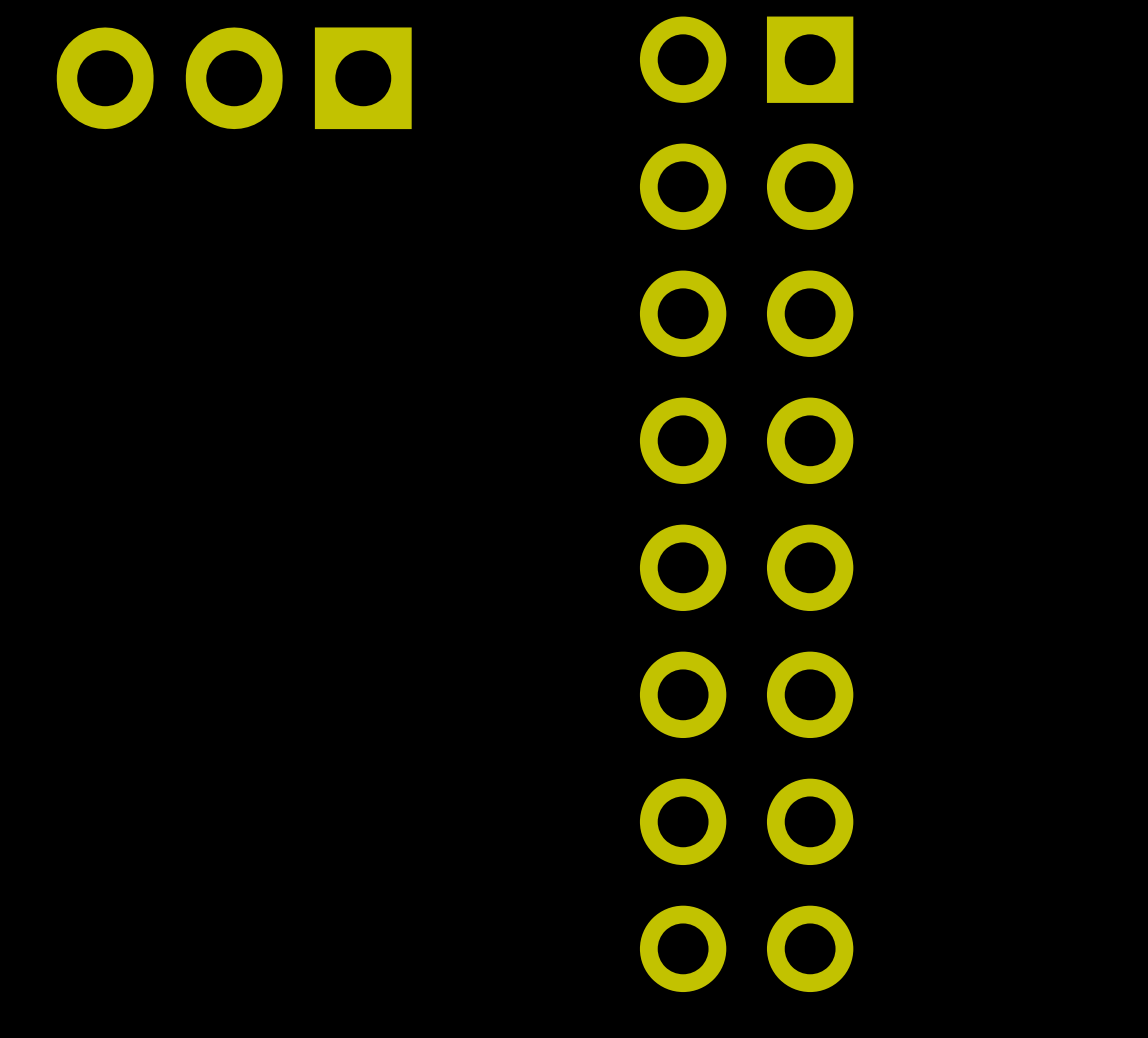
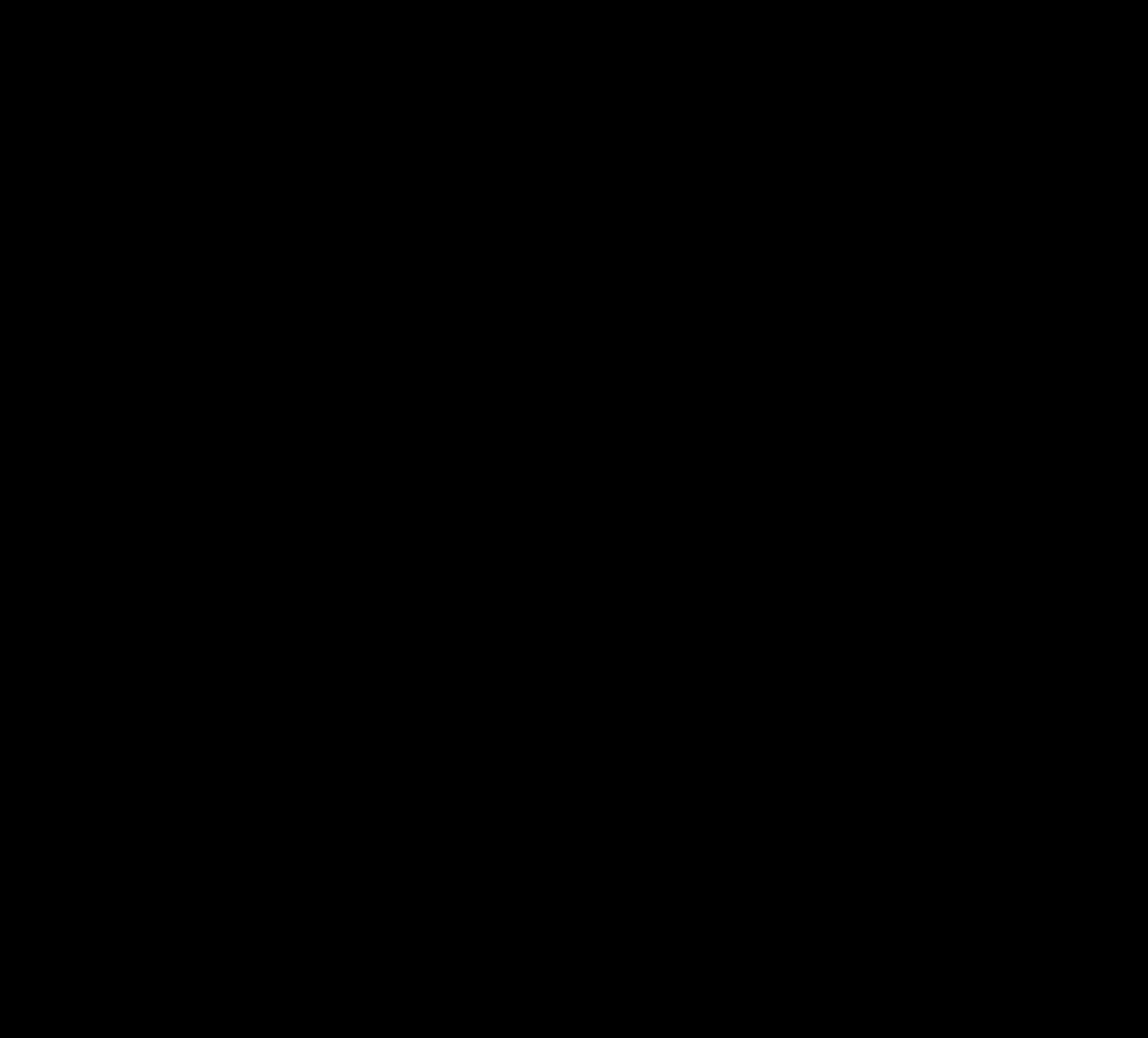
part: (234, 78) -> none
part: (746, 504) -> none

